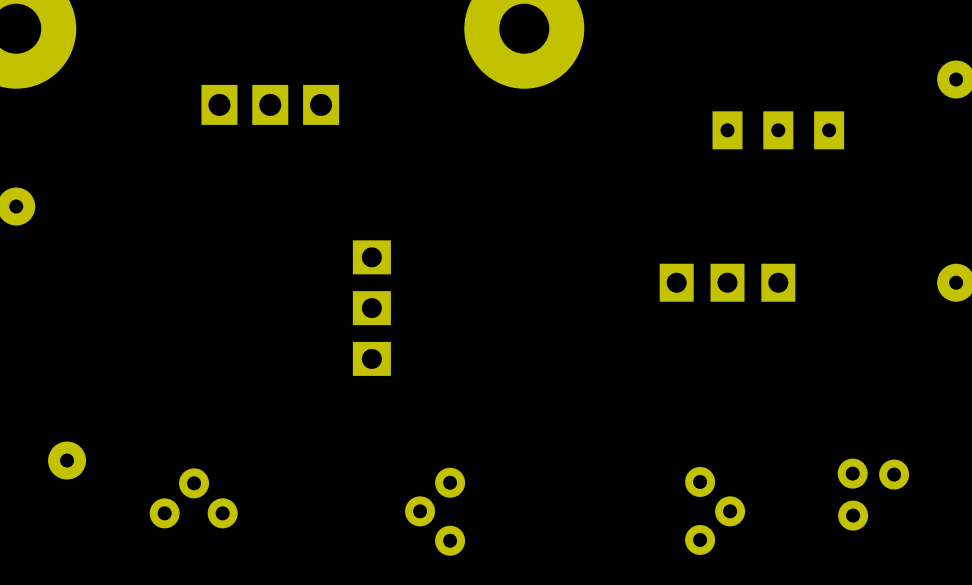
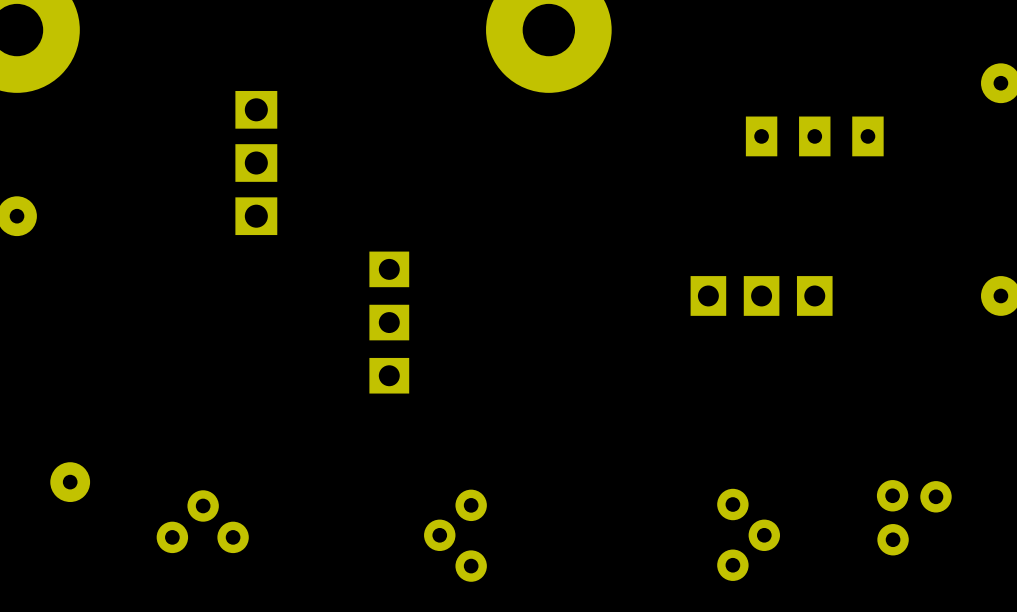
part rotation: 0° (270, 104) -> 90° clockwise (256, 163)

